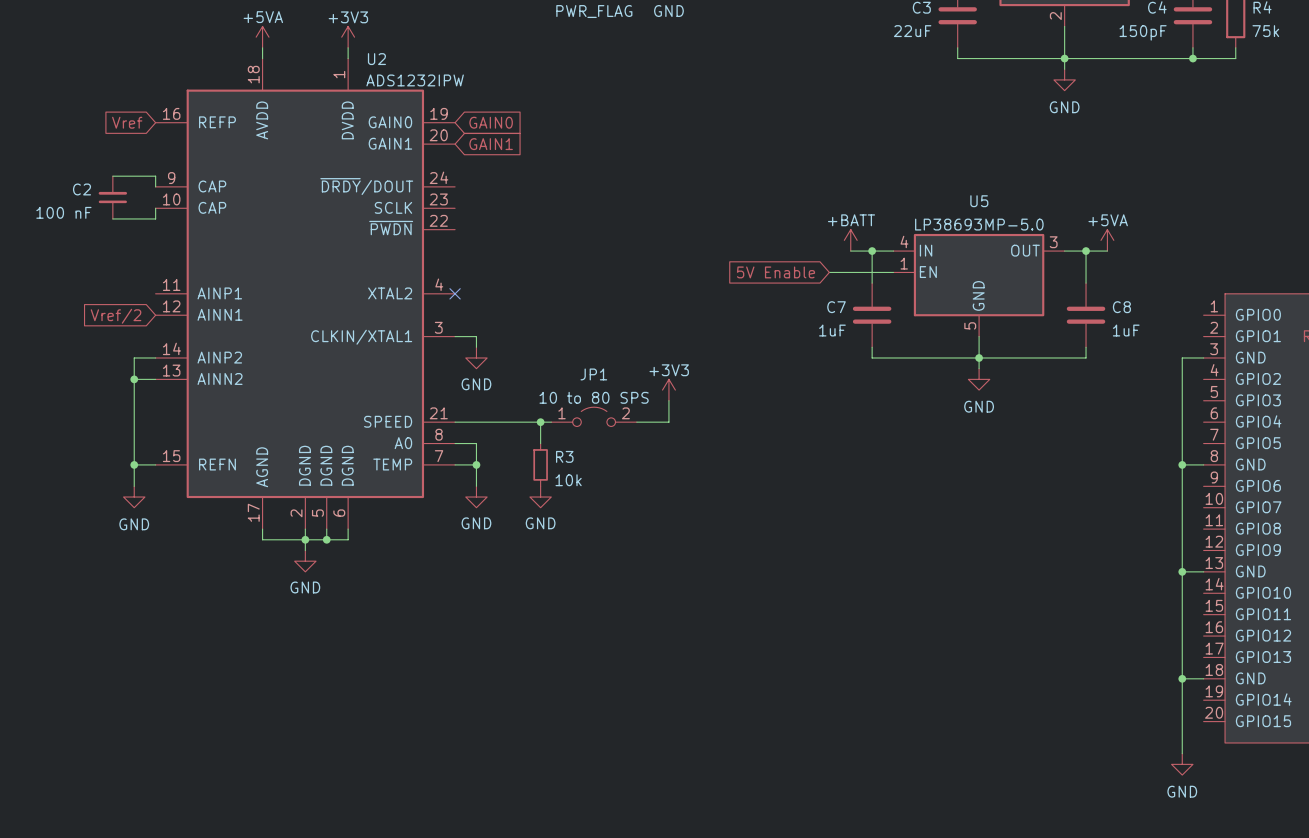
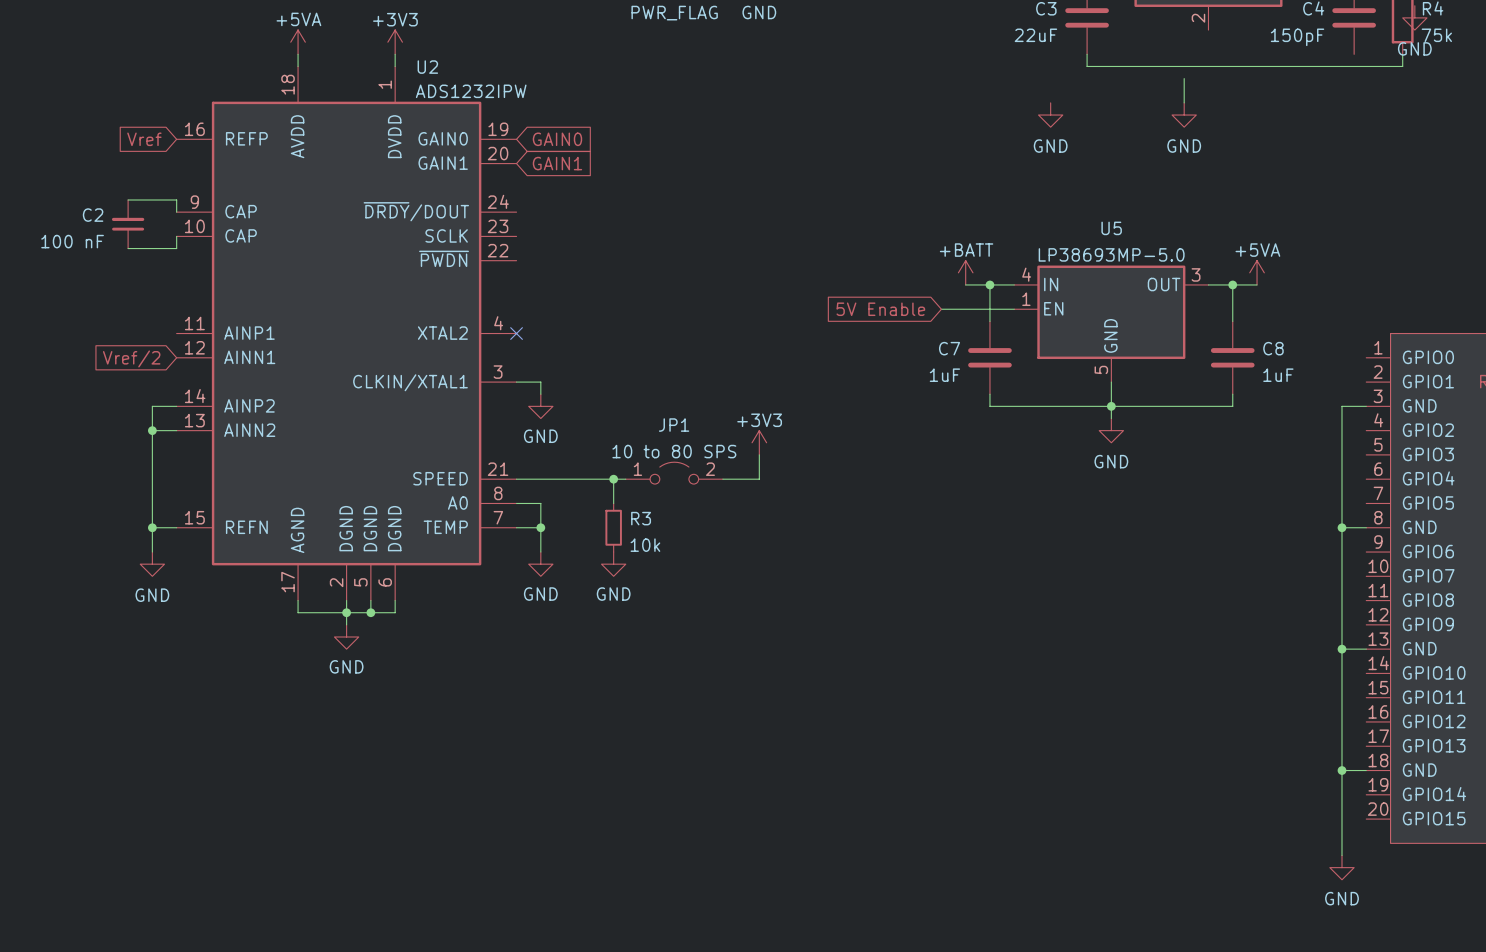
power symbol: none -> GND (1414, 17)
wire: (1064, 26) (1064, 69) -> none
wire: (1192, 47) (1192, 58) -> none
junction: (1064, 58) -> none
junction: (1192, 58) -> none
wire: none -> (1184, 78) (1184, 102)
power symbol position: GND (1064, 79) -> GND (1184, 115)
power symbol: none -> GND (1050, 115)

